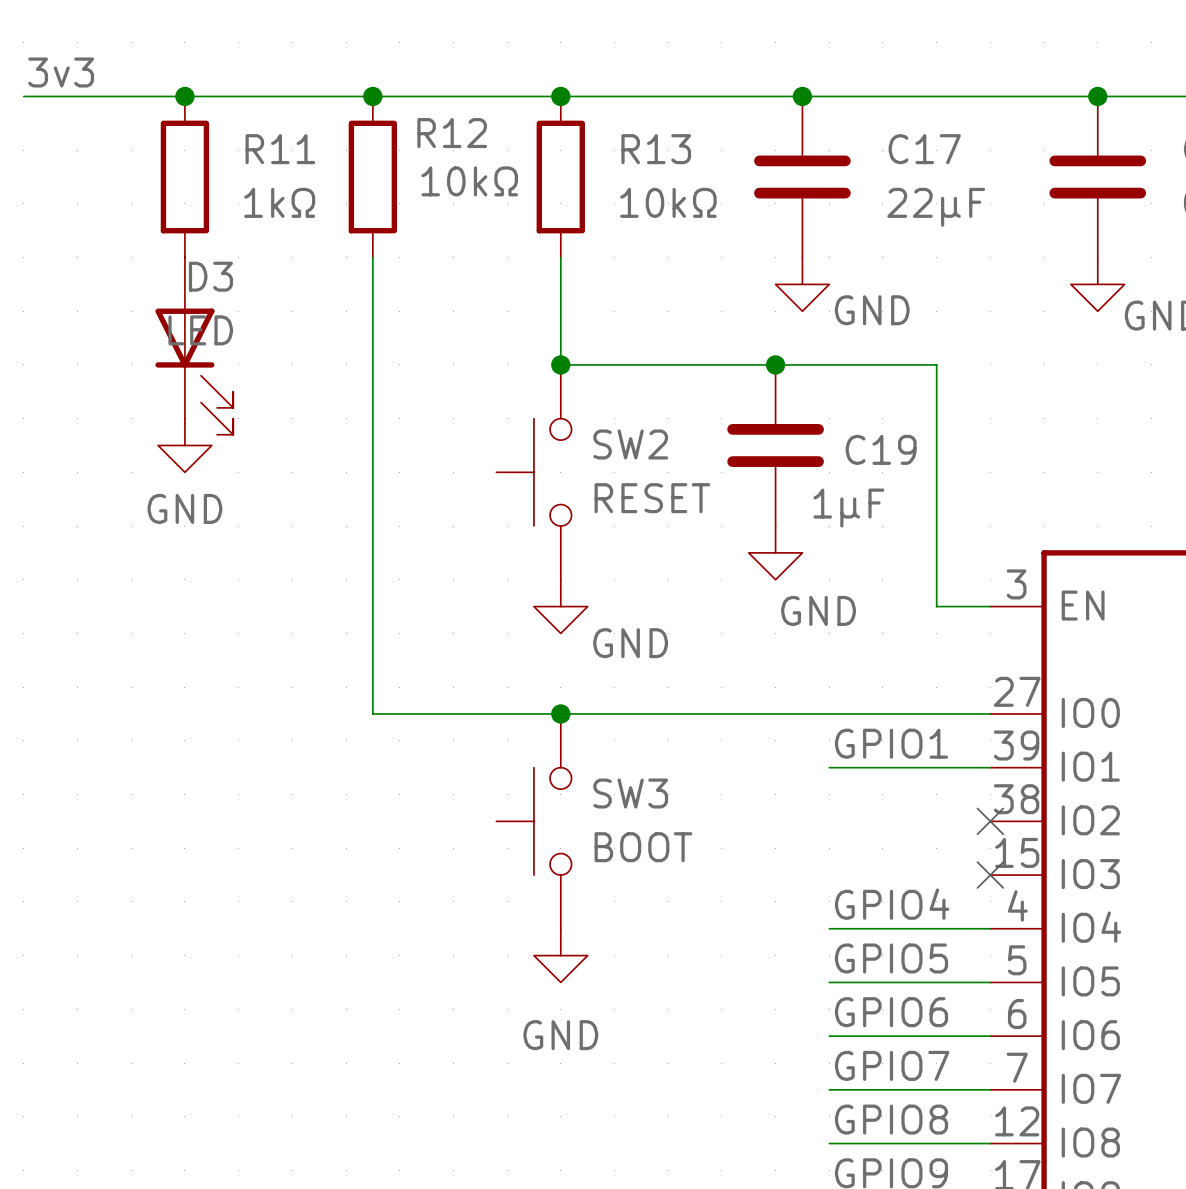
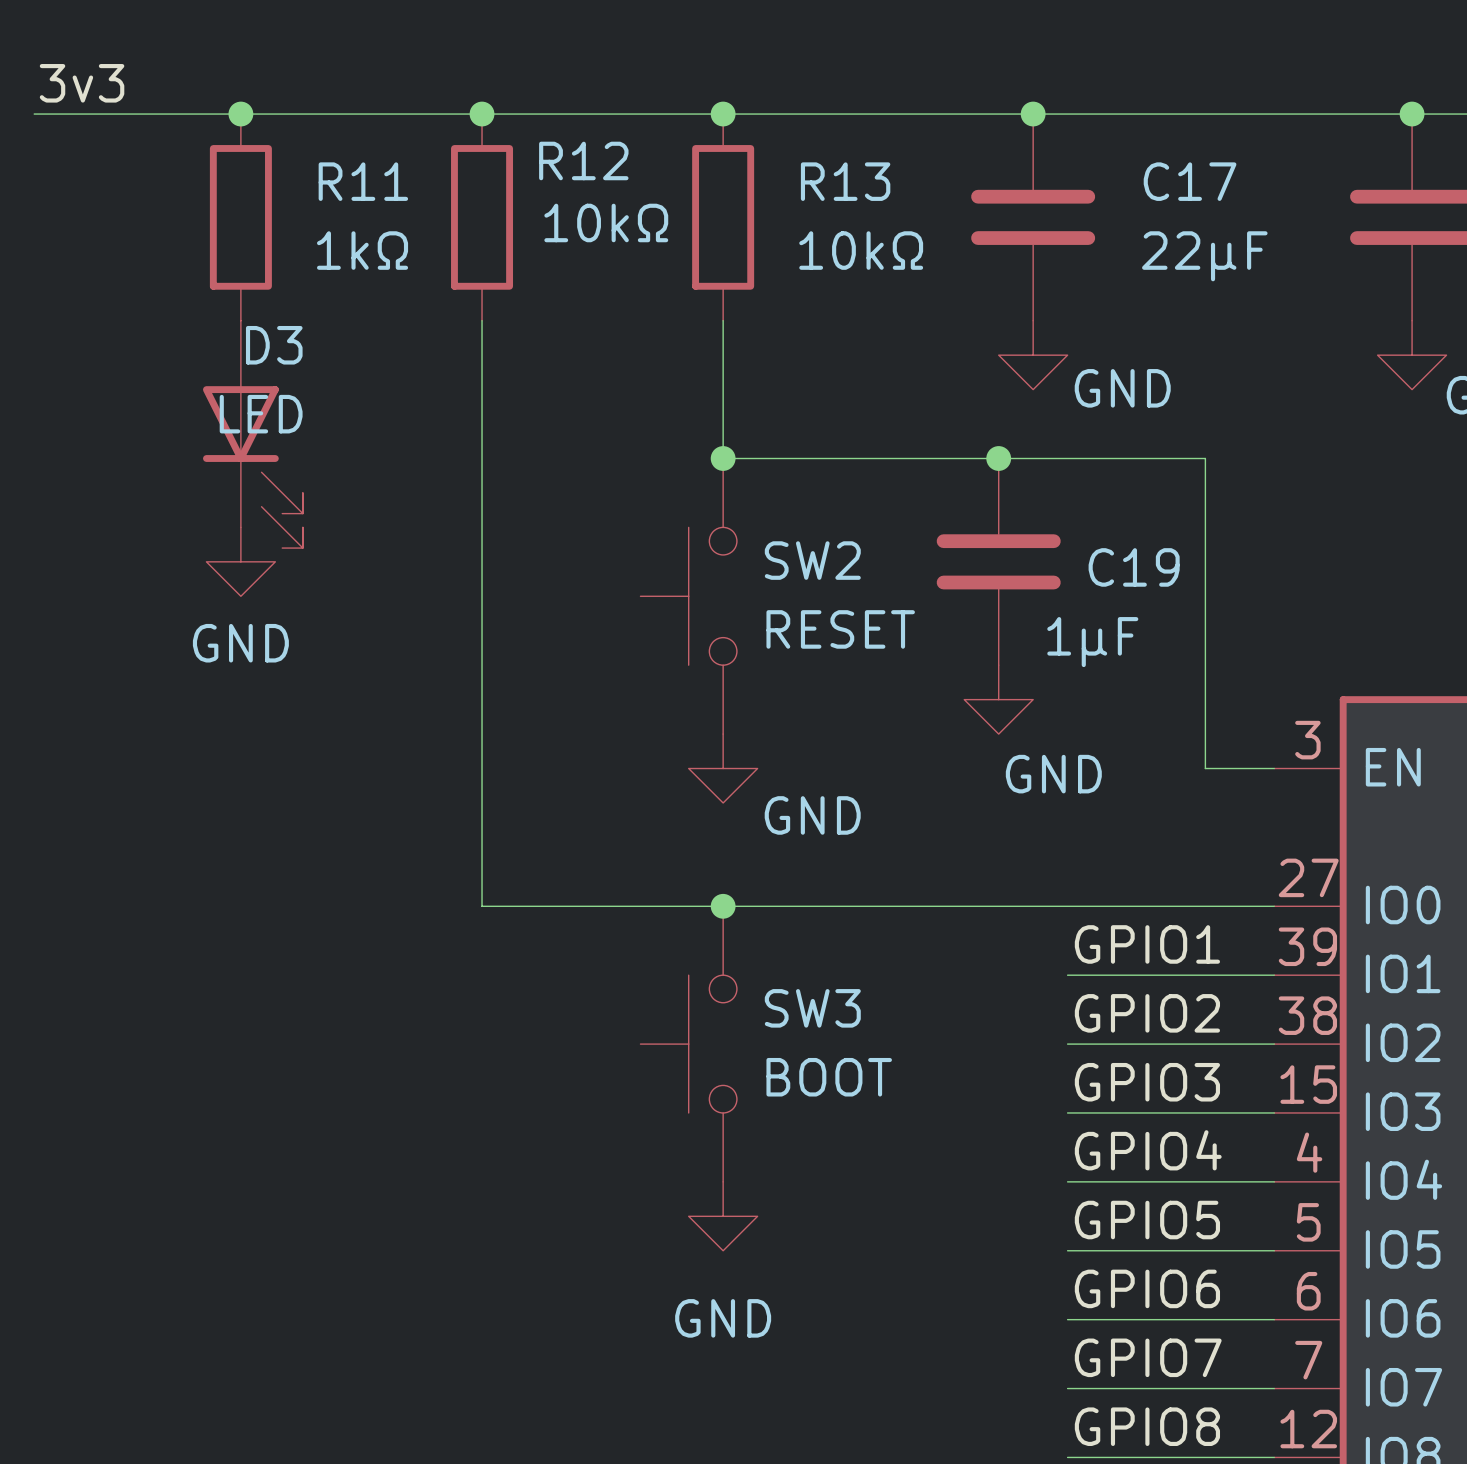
label: none -> GPIO2 (1147, 1013)
wire: none -> (1067, 1044) (1274, 1044)
no-connect mark: (990, 821) -> none
label: none -> GPIO3 (1147, 1082)
wire: none -> (1067, 1112) (1274, 1112)
no-connect mark: (990, 875) -> none

